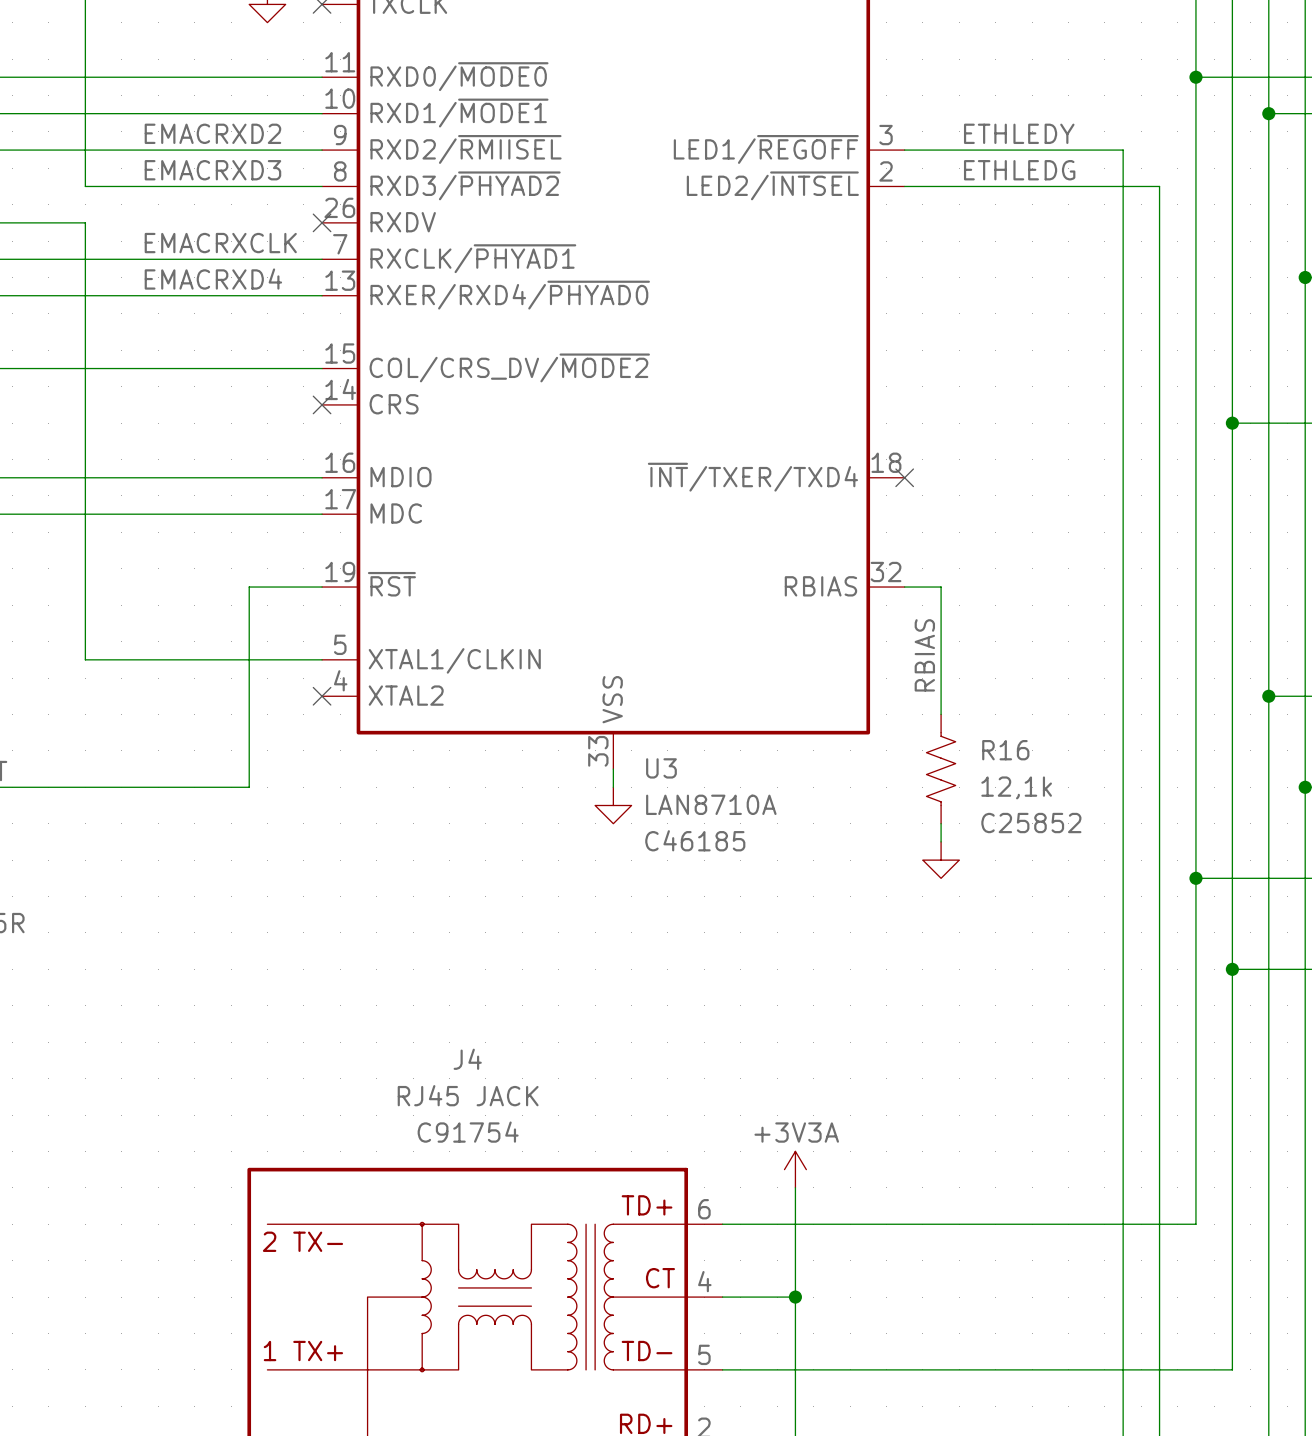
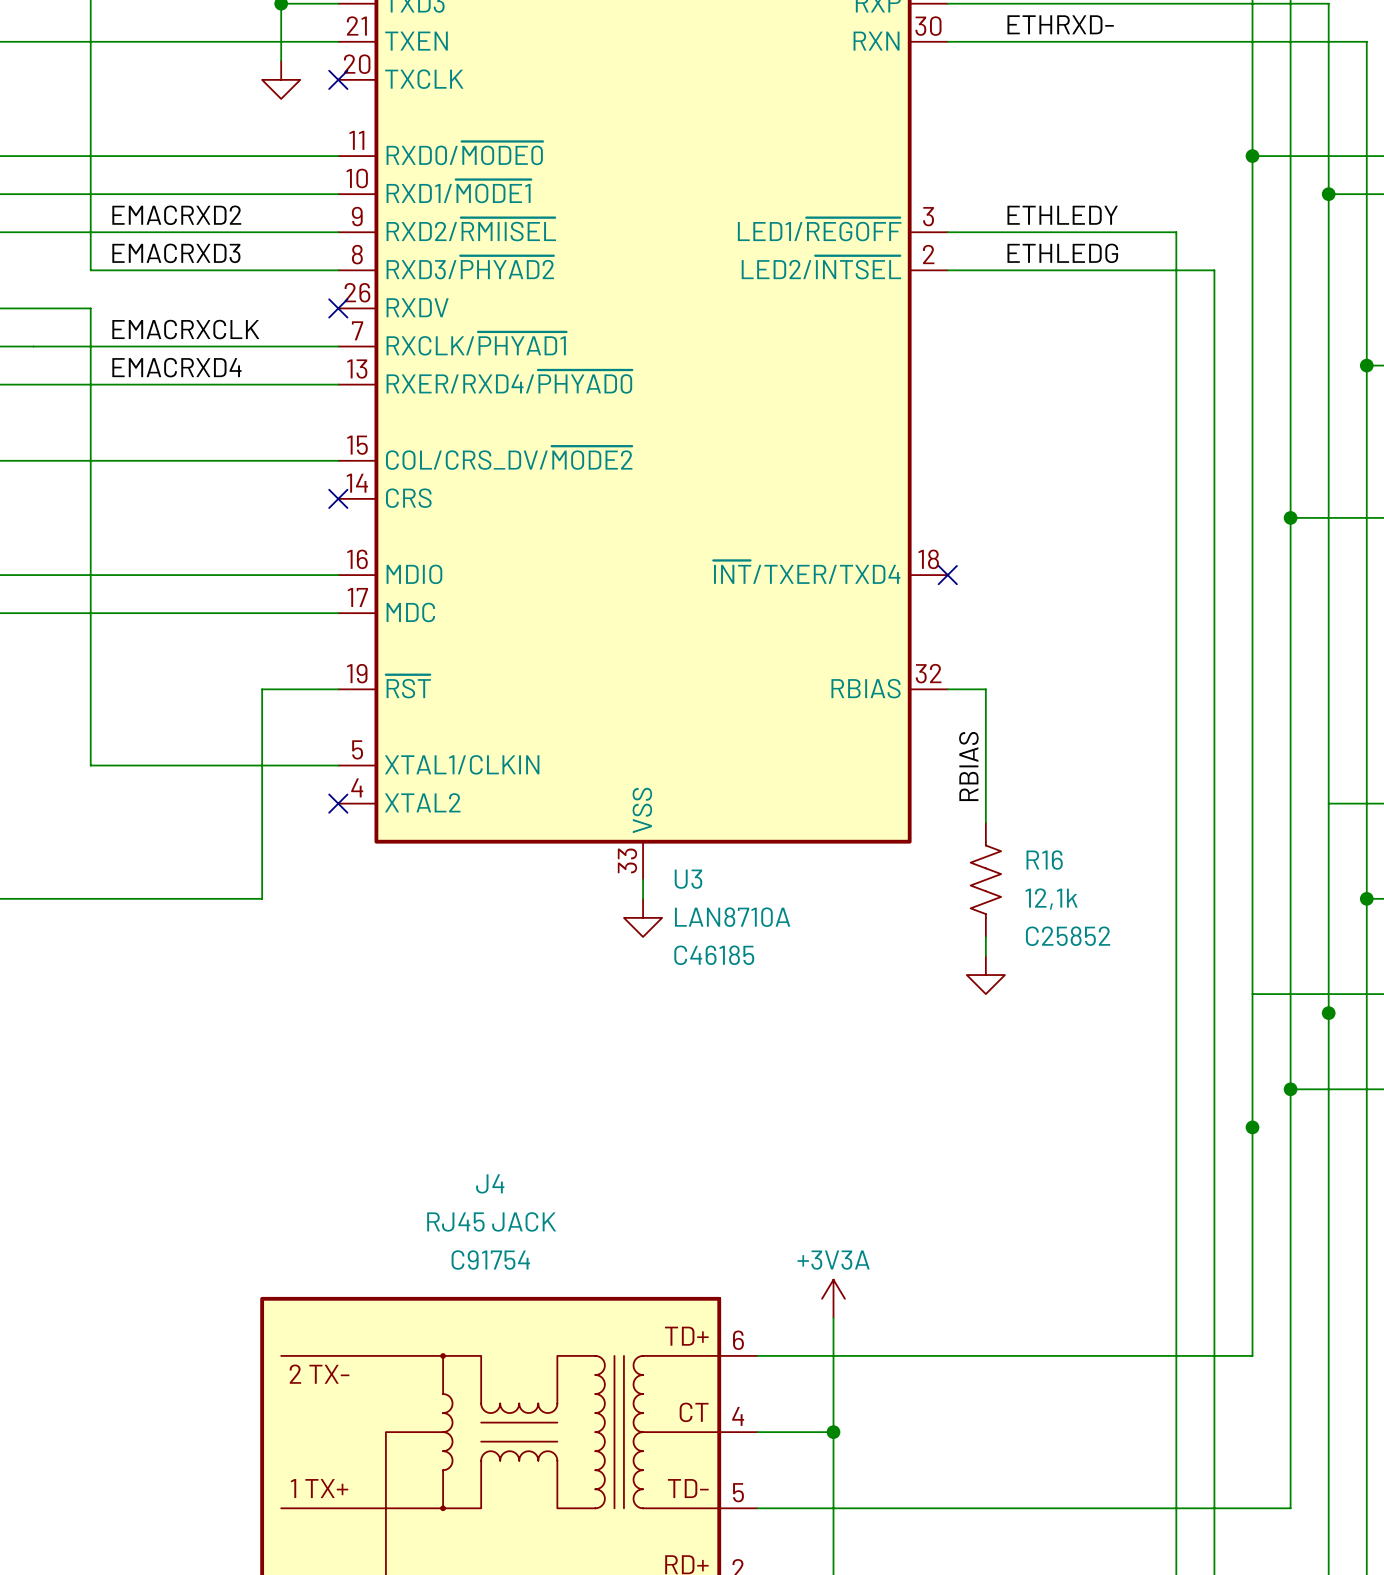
label position: EMACRXD2 (212, 133) -> EMACRXD2 (176, 215)
label position: EMACRXD3 (212, 170) -> EMACRXD3 (176, 253)
label position: EMACRXCLK (220, 243) -> EMACRXCLK (185, 329)
label position: EMACRXD4 (213, 279) -> EMACRXD4 (176, 367)
junction: (1268, 696) -> none
junction: (1195, 878) -> none
junction: none -> (1328, 1013)
junction: none -> (1252, 1127)

